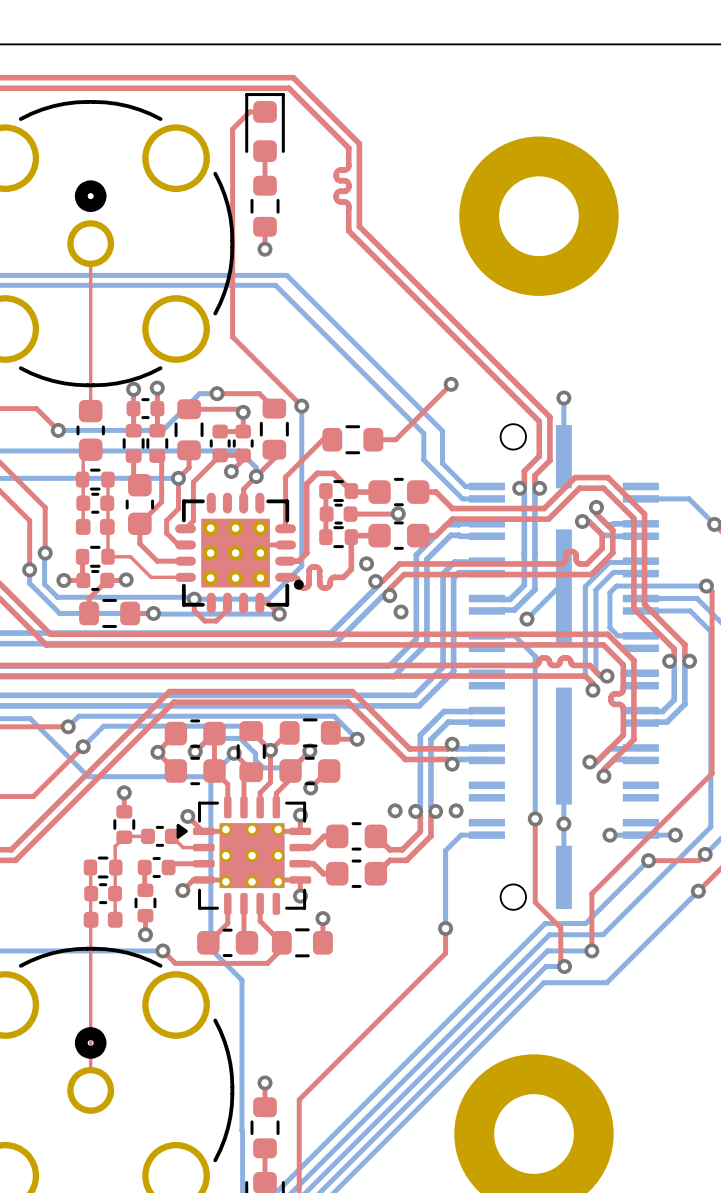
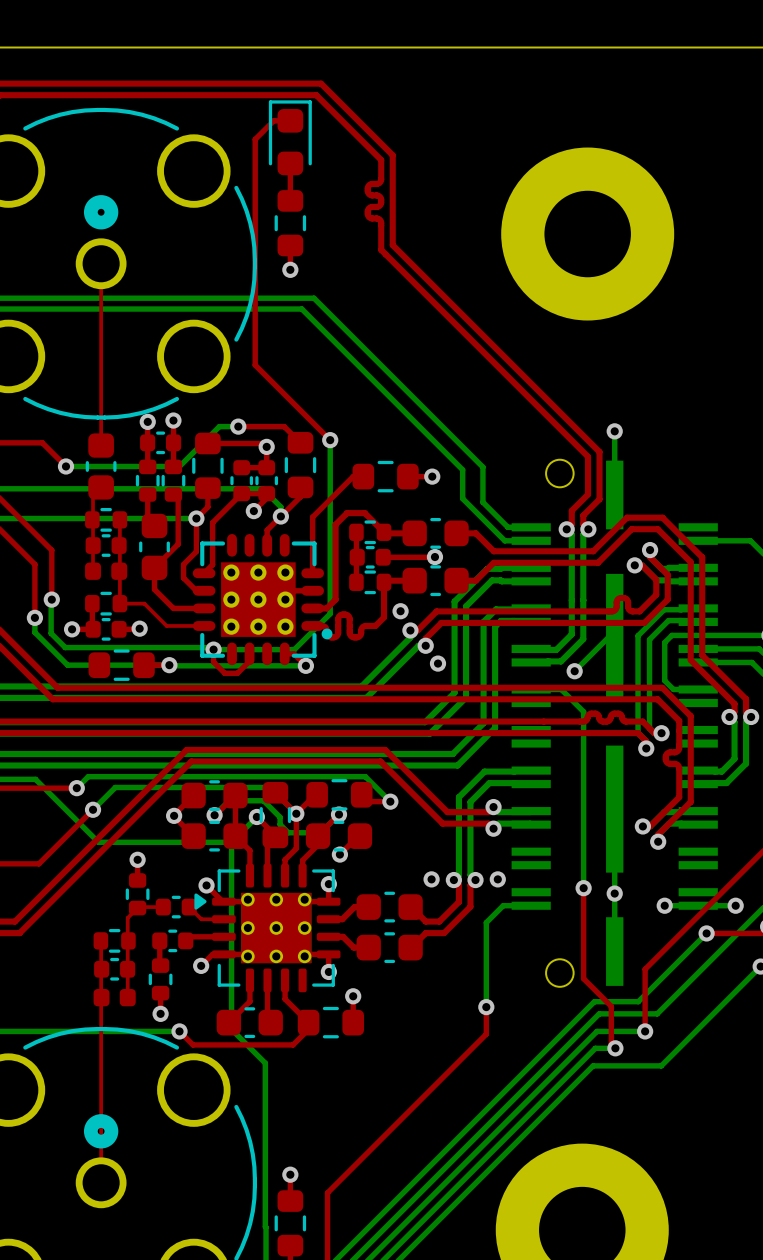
top track: (451, 384) (395, 439) -> none
via position: (451, 384) -> (432, 476)
top track: (107, 580) (89, 598) (89, 613) -> none

